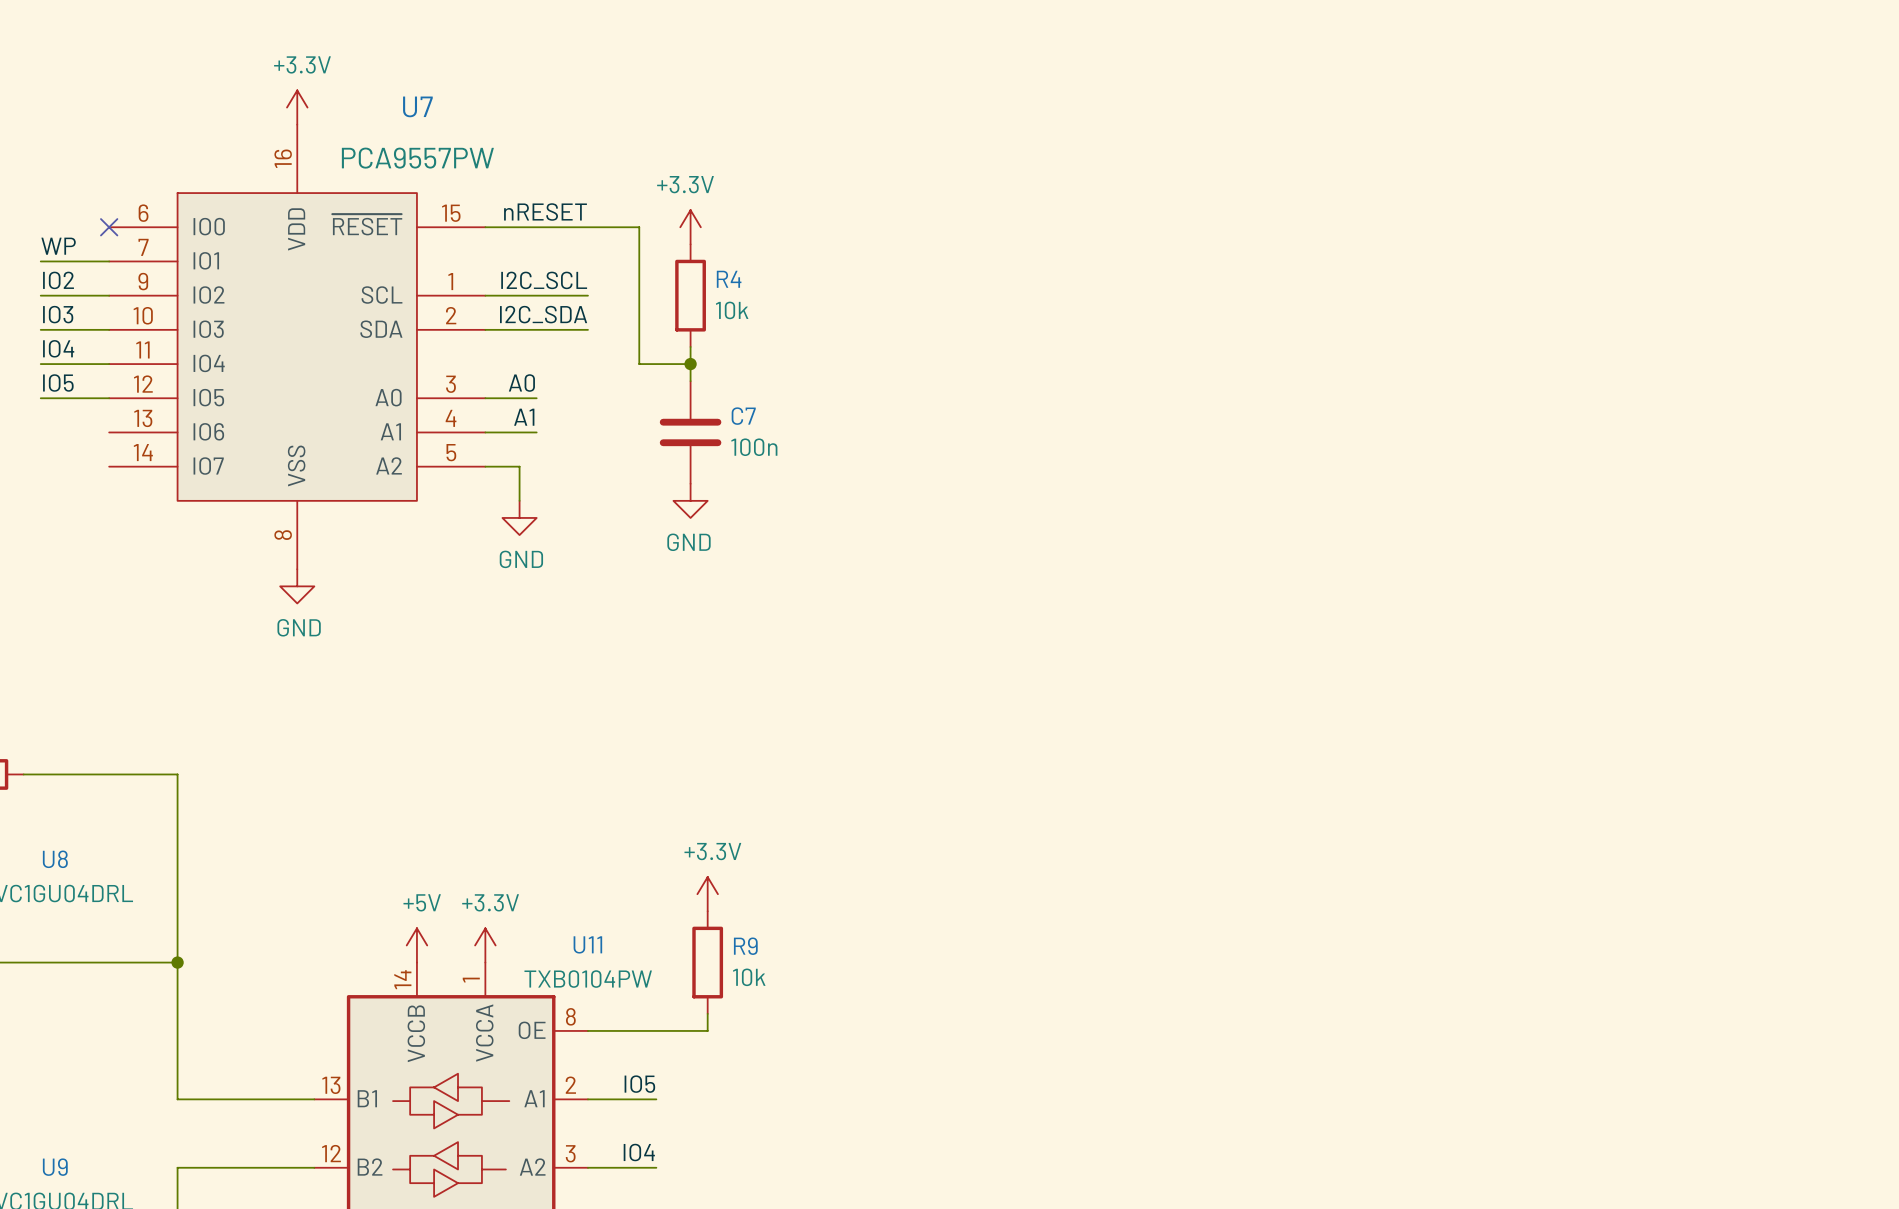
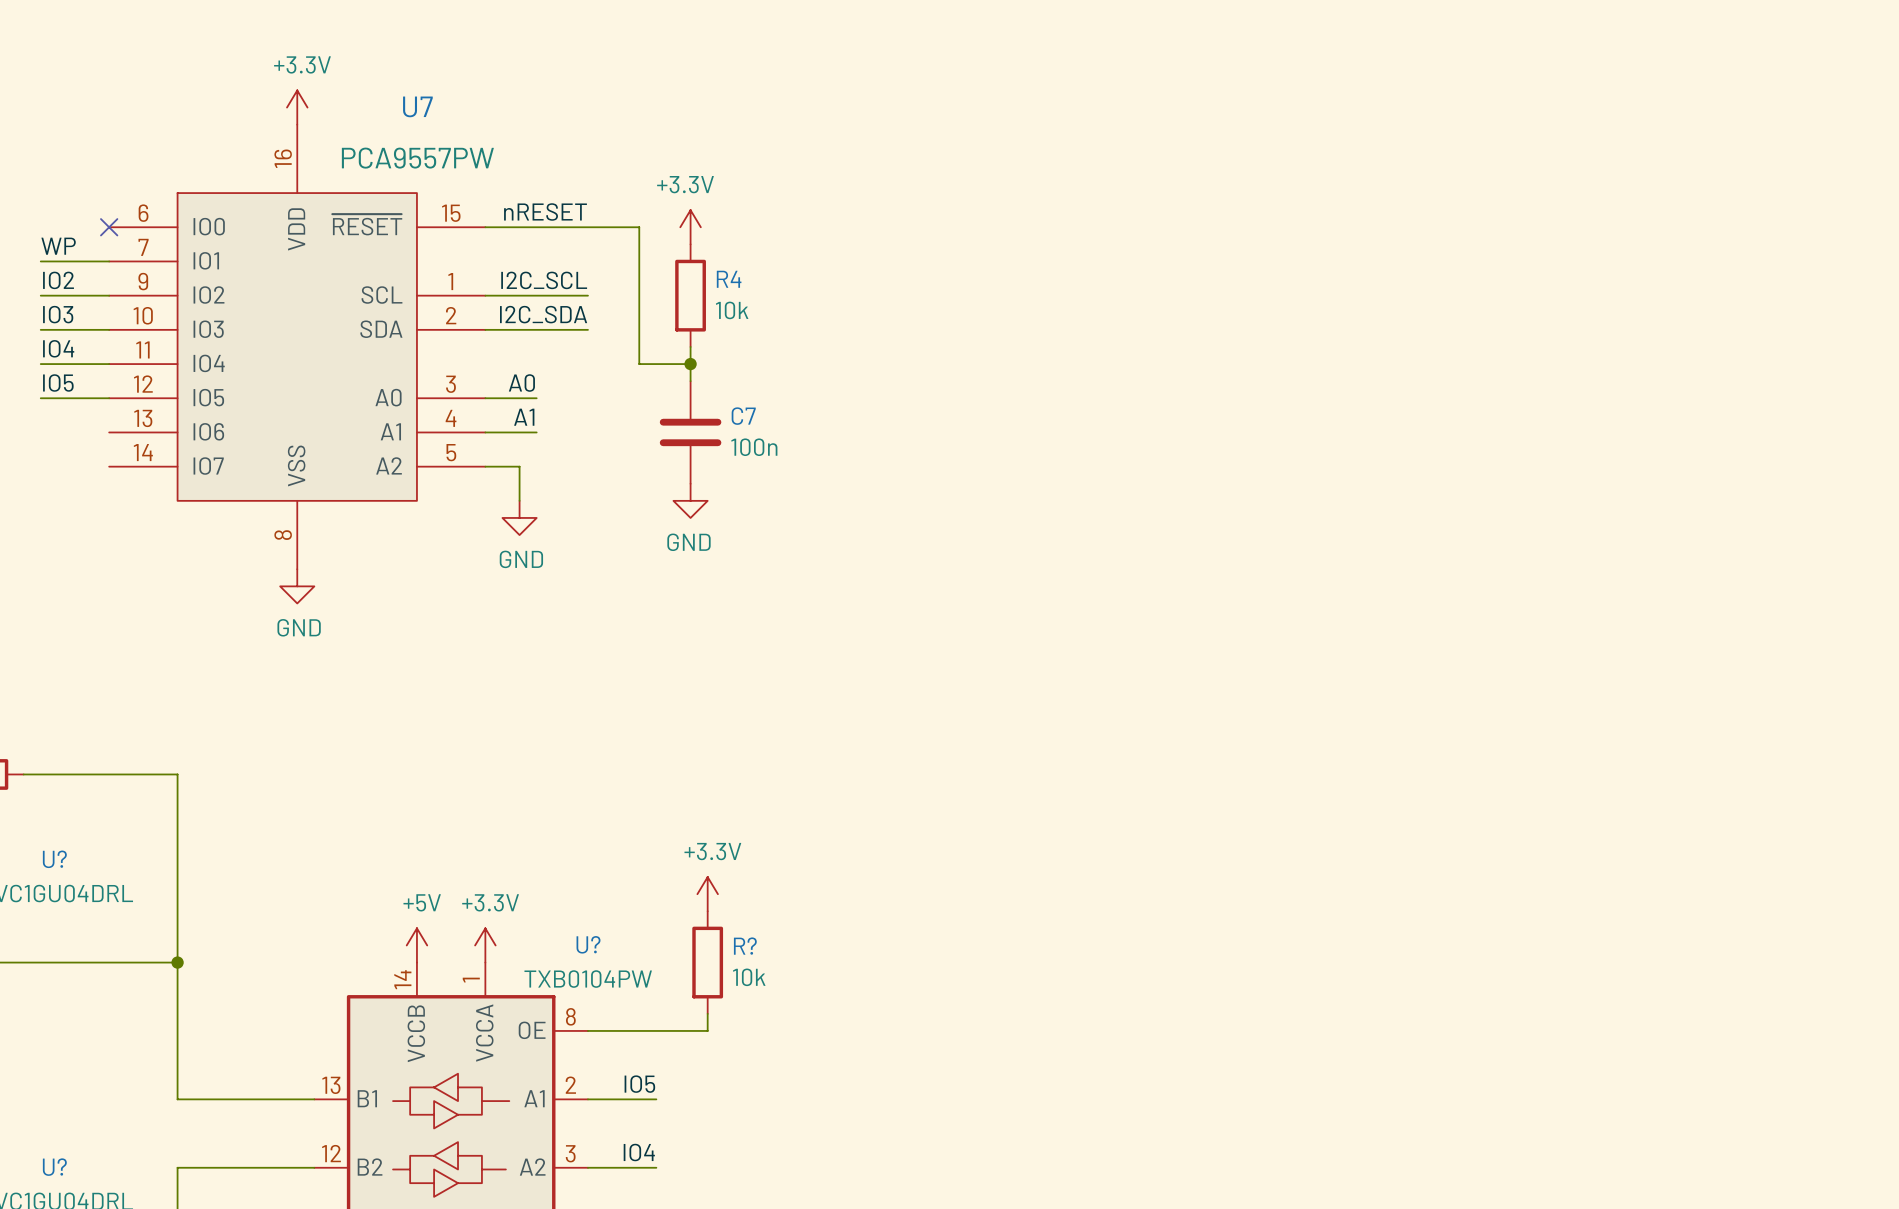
U8 name: U8 (55, 859) -> U? (54, 859)
U11 name: U11 (587, 944) -> U? (588, 944)
R9 name: R9 (745, 946) -> R? (745, 946)
U9 name: U9 (55, 1167) -> U? (54, 1167)

